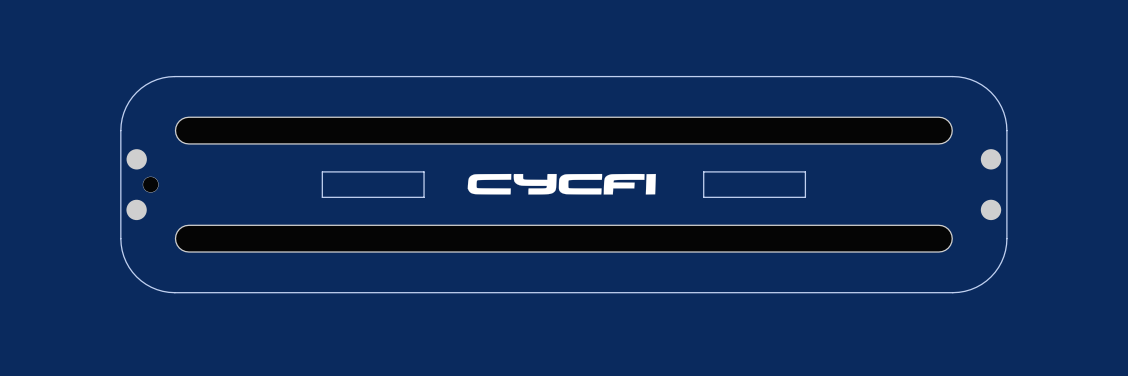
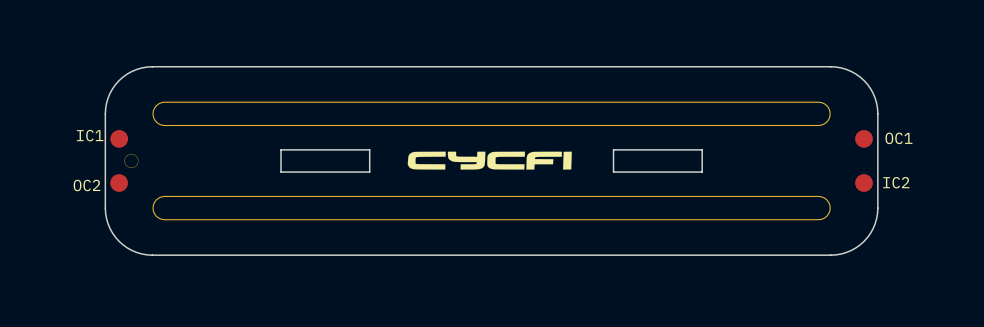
IC1 name: none -> IC1 (90, 135)
OC1 name: none -> OC1 (898, 138)
IC2 name: none -> IC2 (896, 182)
OC2 name: none -> OC2 (87, 185)

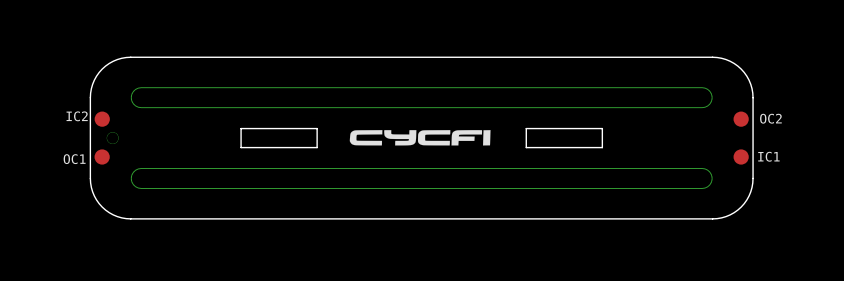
IC1 name: IC1 (90, 135) -> IC2 (77, 116)
OC1 name: OC1 (898, 138) -> OC2 (770, 118)
IC2 name: IC2 (896, 182) -> IC1 (768, 156)
OC2 name: OC2 (87, 185) -> OC1 (74, 159)

